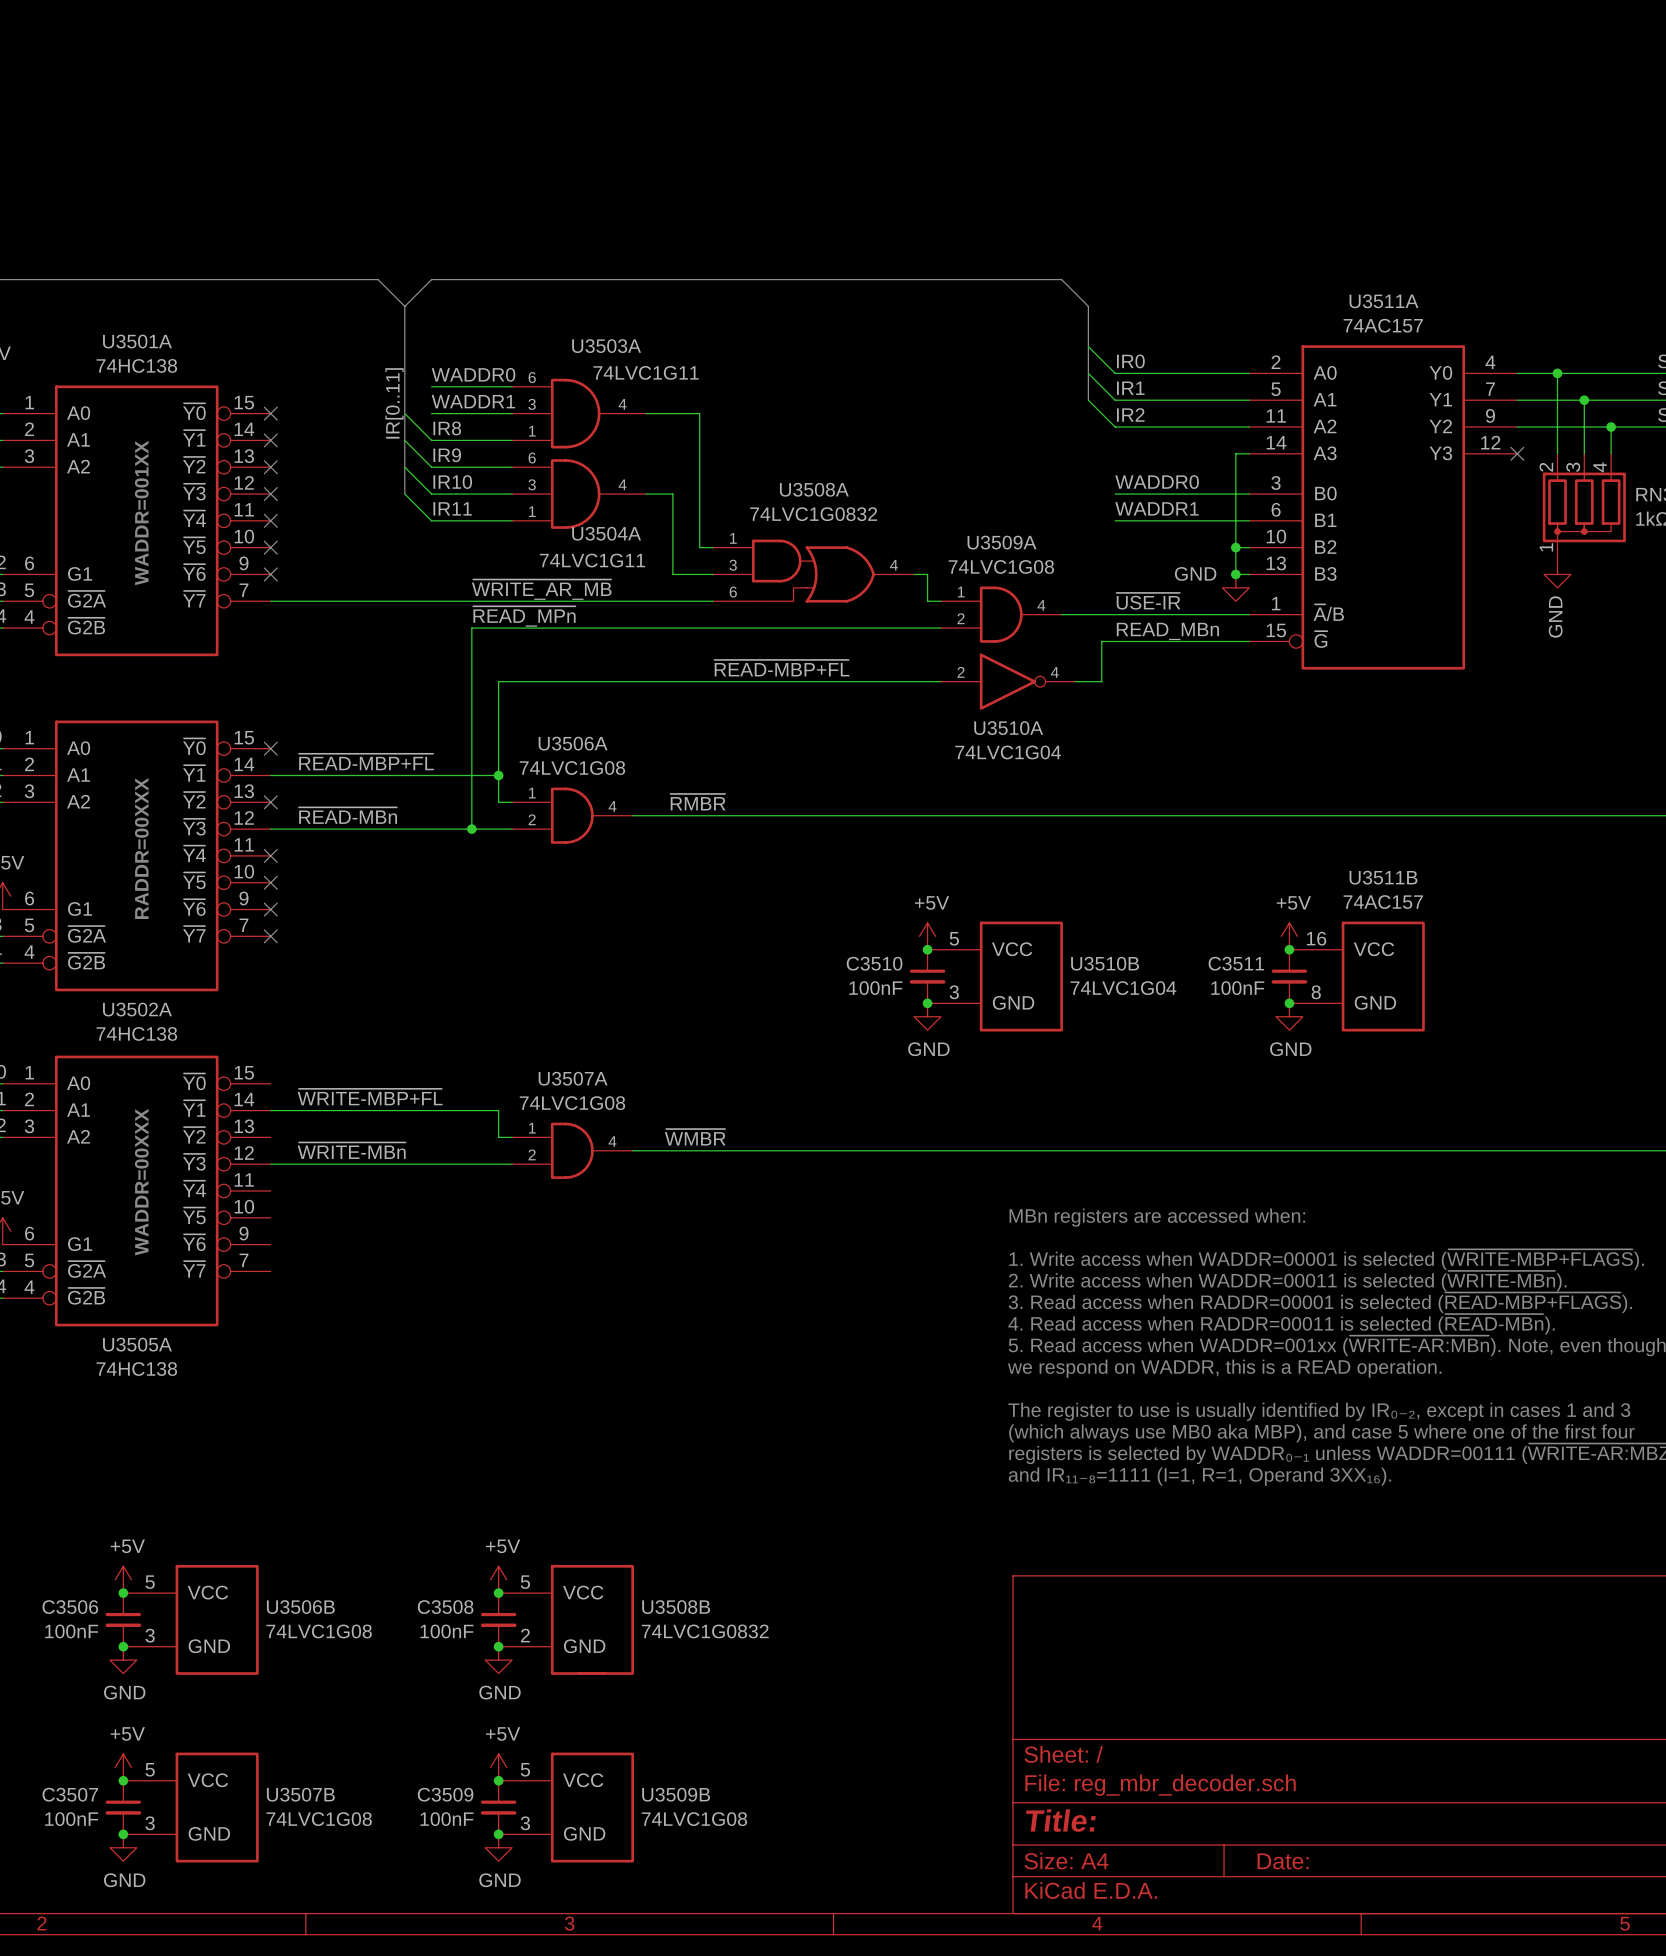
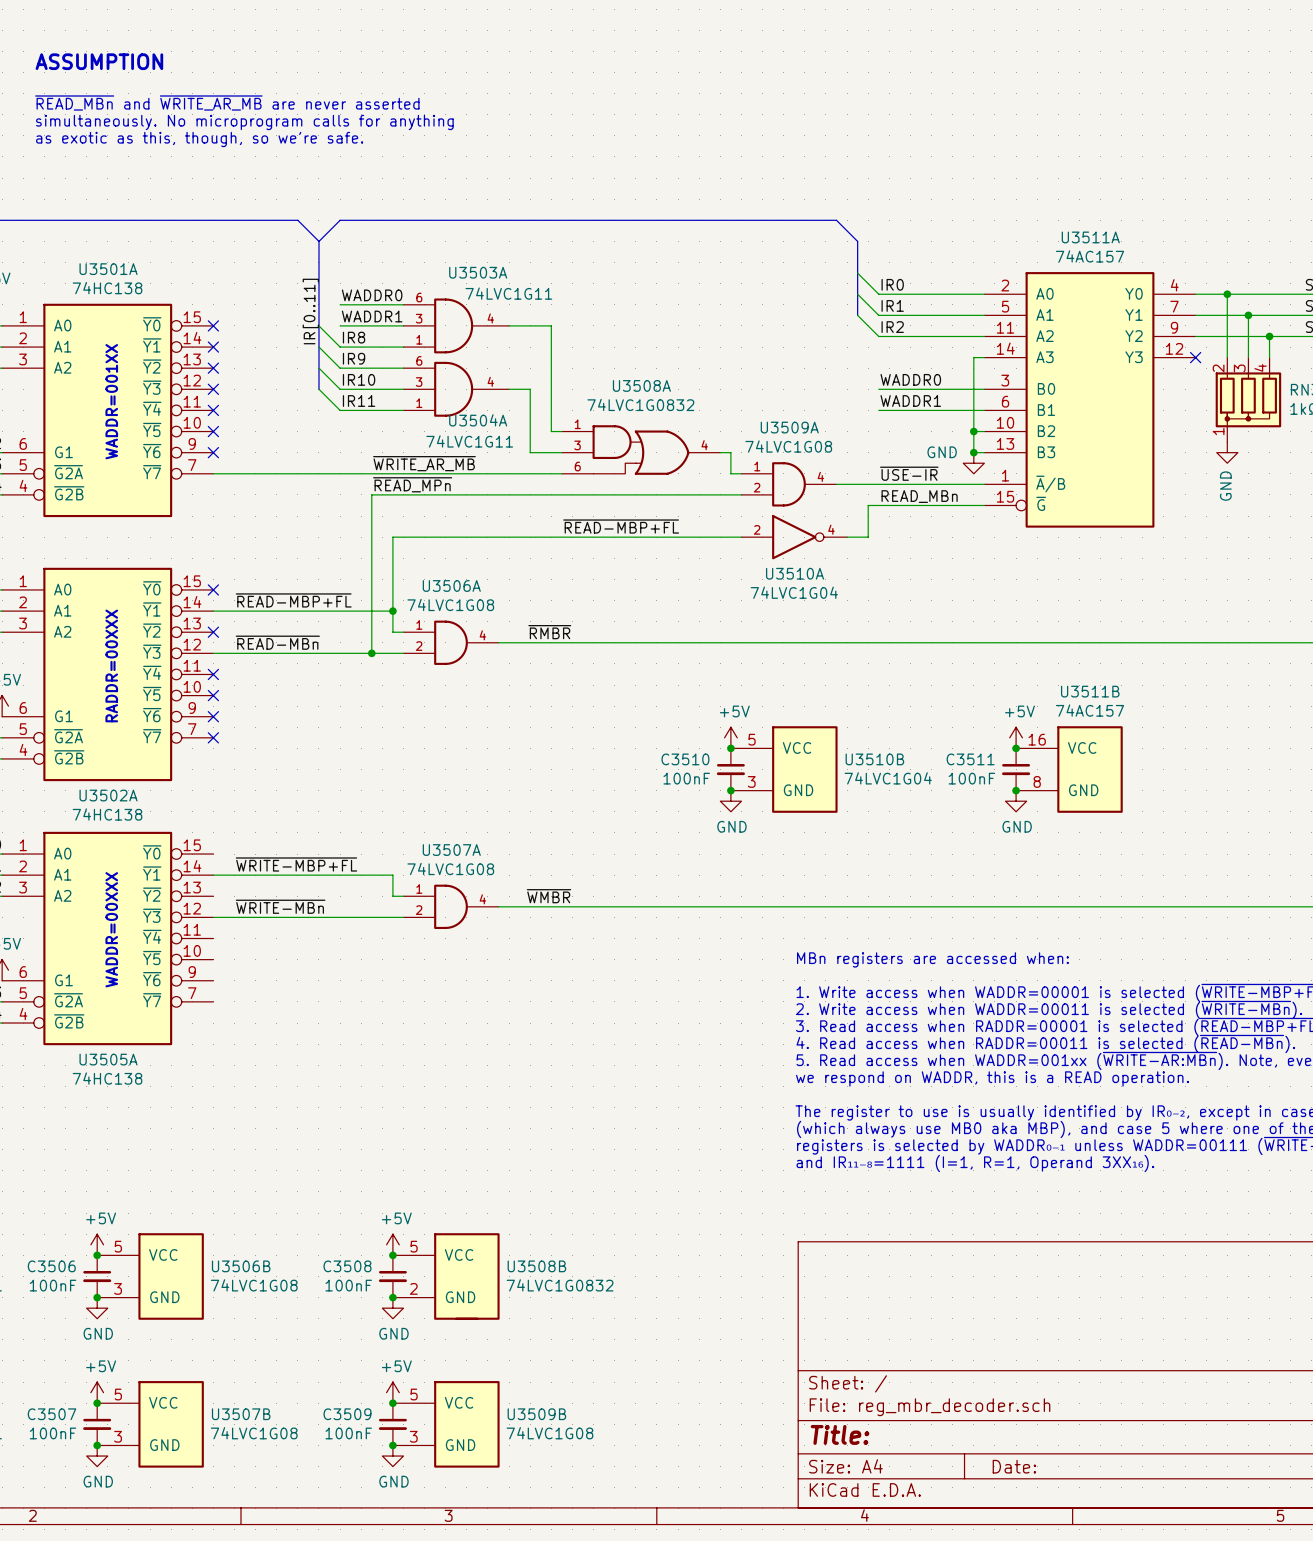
text: none -> ASSUMPTION (99, 61)
text: none -> ~{READ_MBn} and ~{WRITE_AR_MB} are never asserted (227, 103)
text: none -> simultaneously. No microprogram calls for anything (244, 122)
text: none -> as exotic as this, though, so we're safe. (199, 139)

